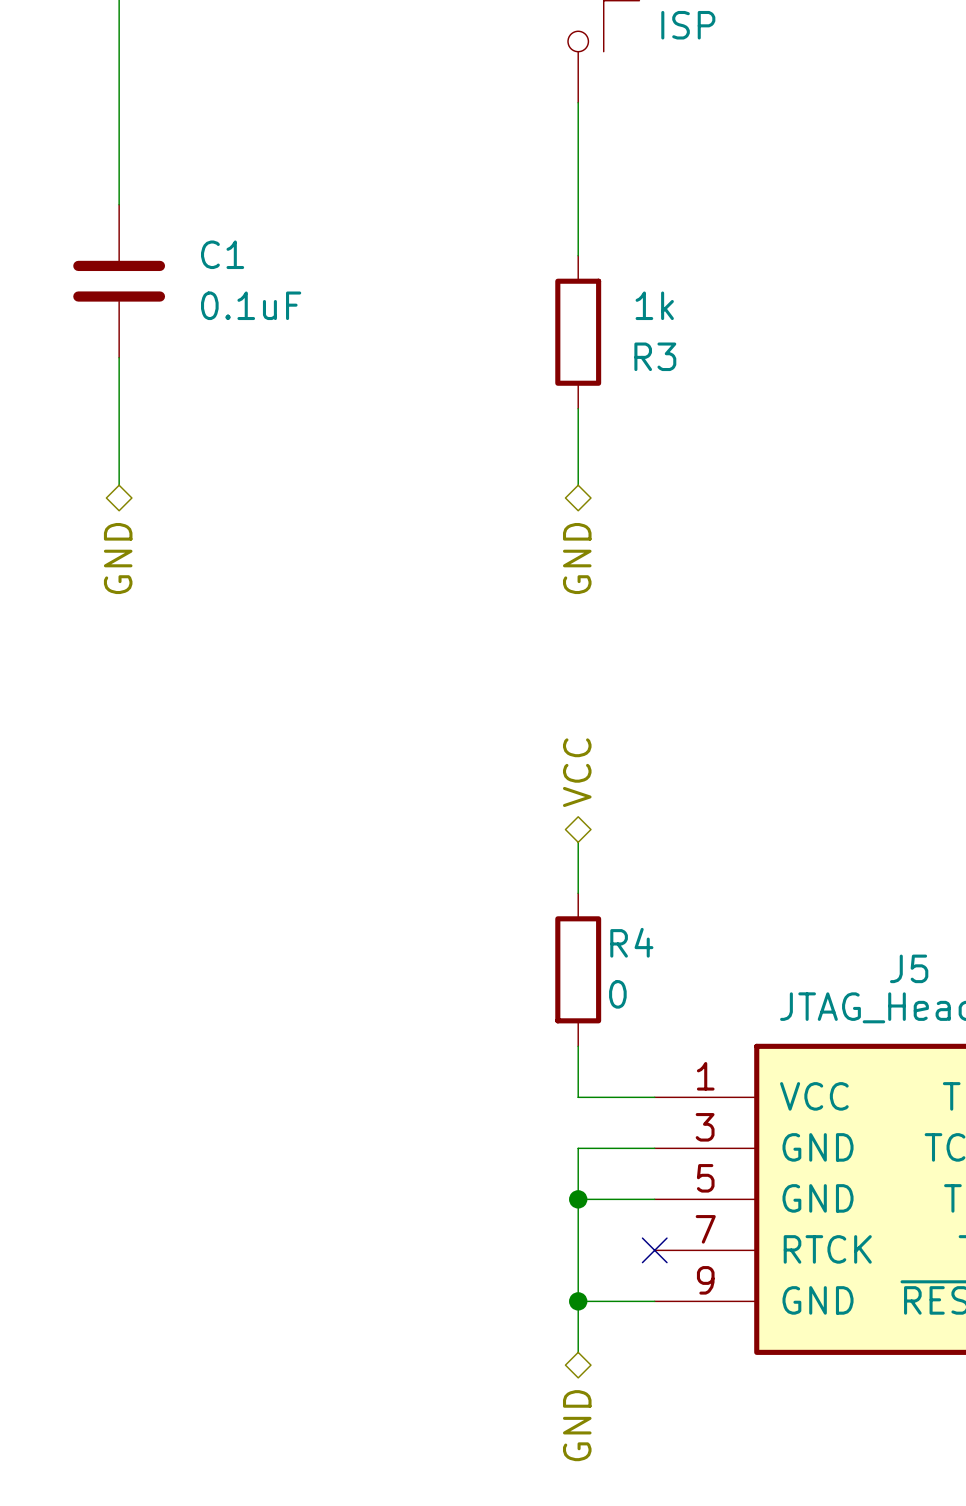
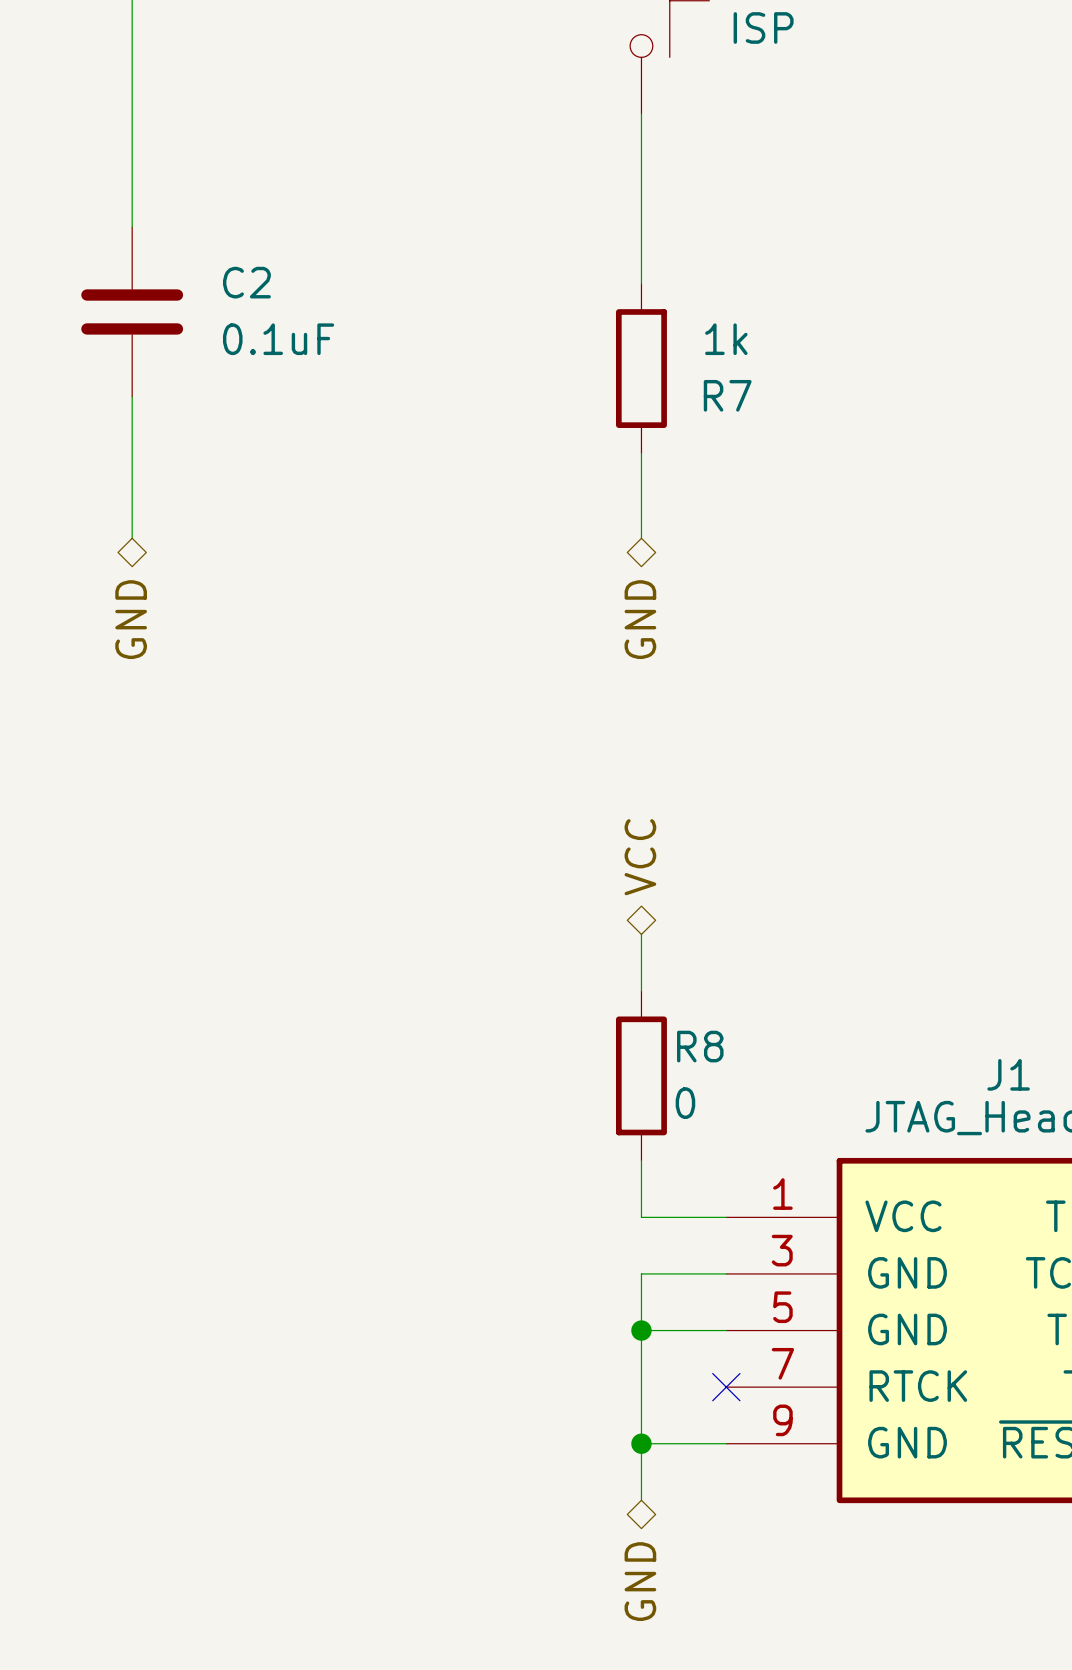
C1 name: C1 (222, 254) -> C2 (246, 282)
R3 name: R3 (655, 356) -> R7 (727, 395)
R4 name: R4 (631, 942) -> R8 (700, 1046)
J5 name: J5 (909, 968) -> J1 (1008, 1074)

